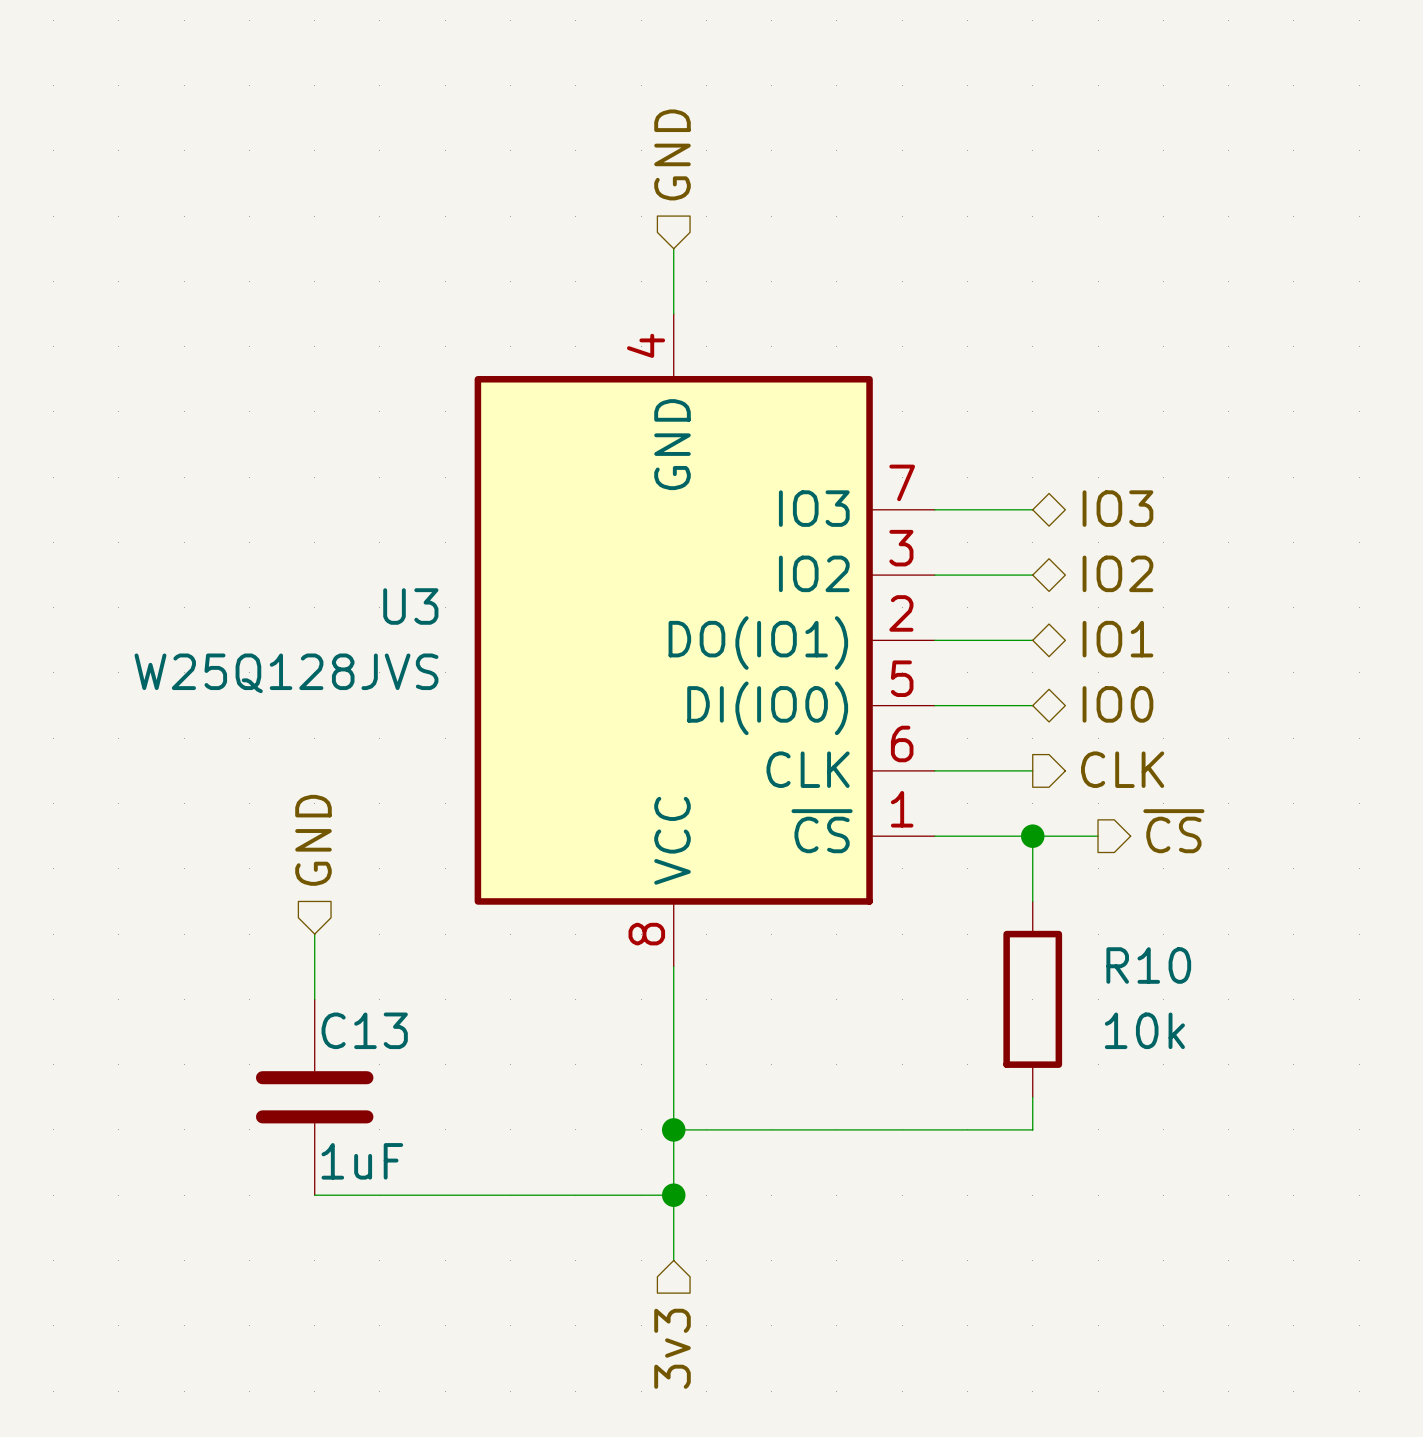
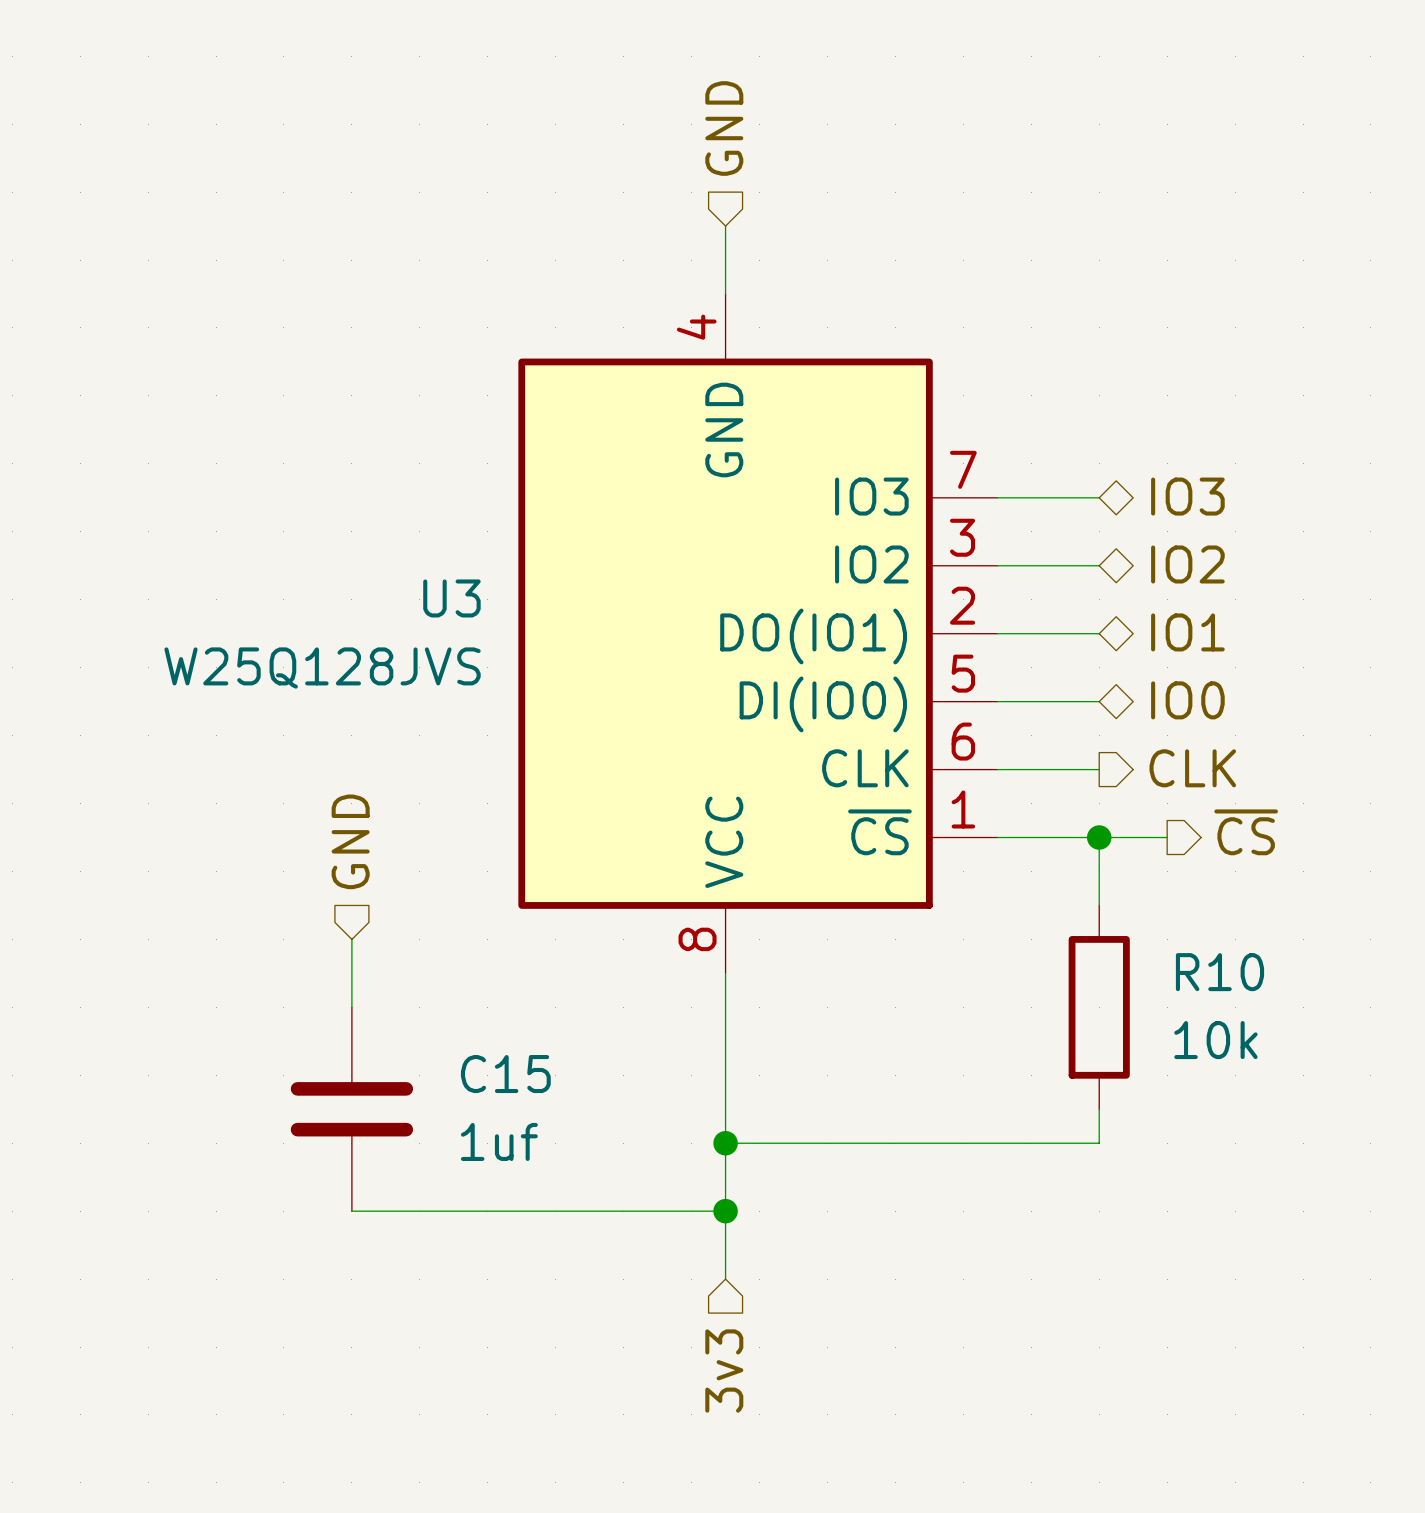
C13 name: C13 (364, 1030) -> C15 (505, 1074)
C13 value: 1uF (362, 1161) -> 1uf (499, 1141)

